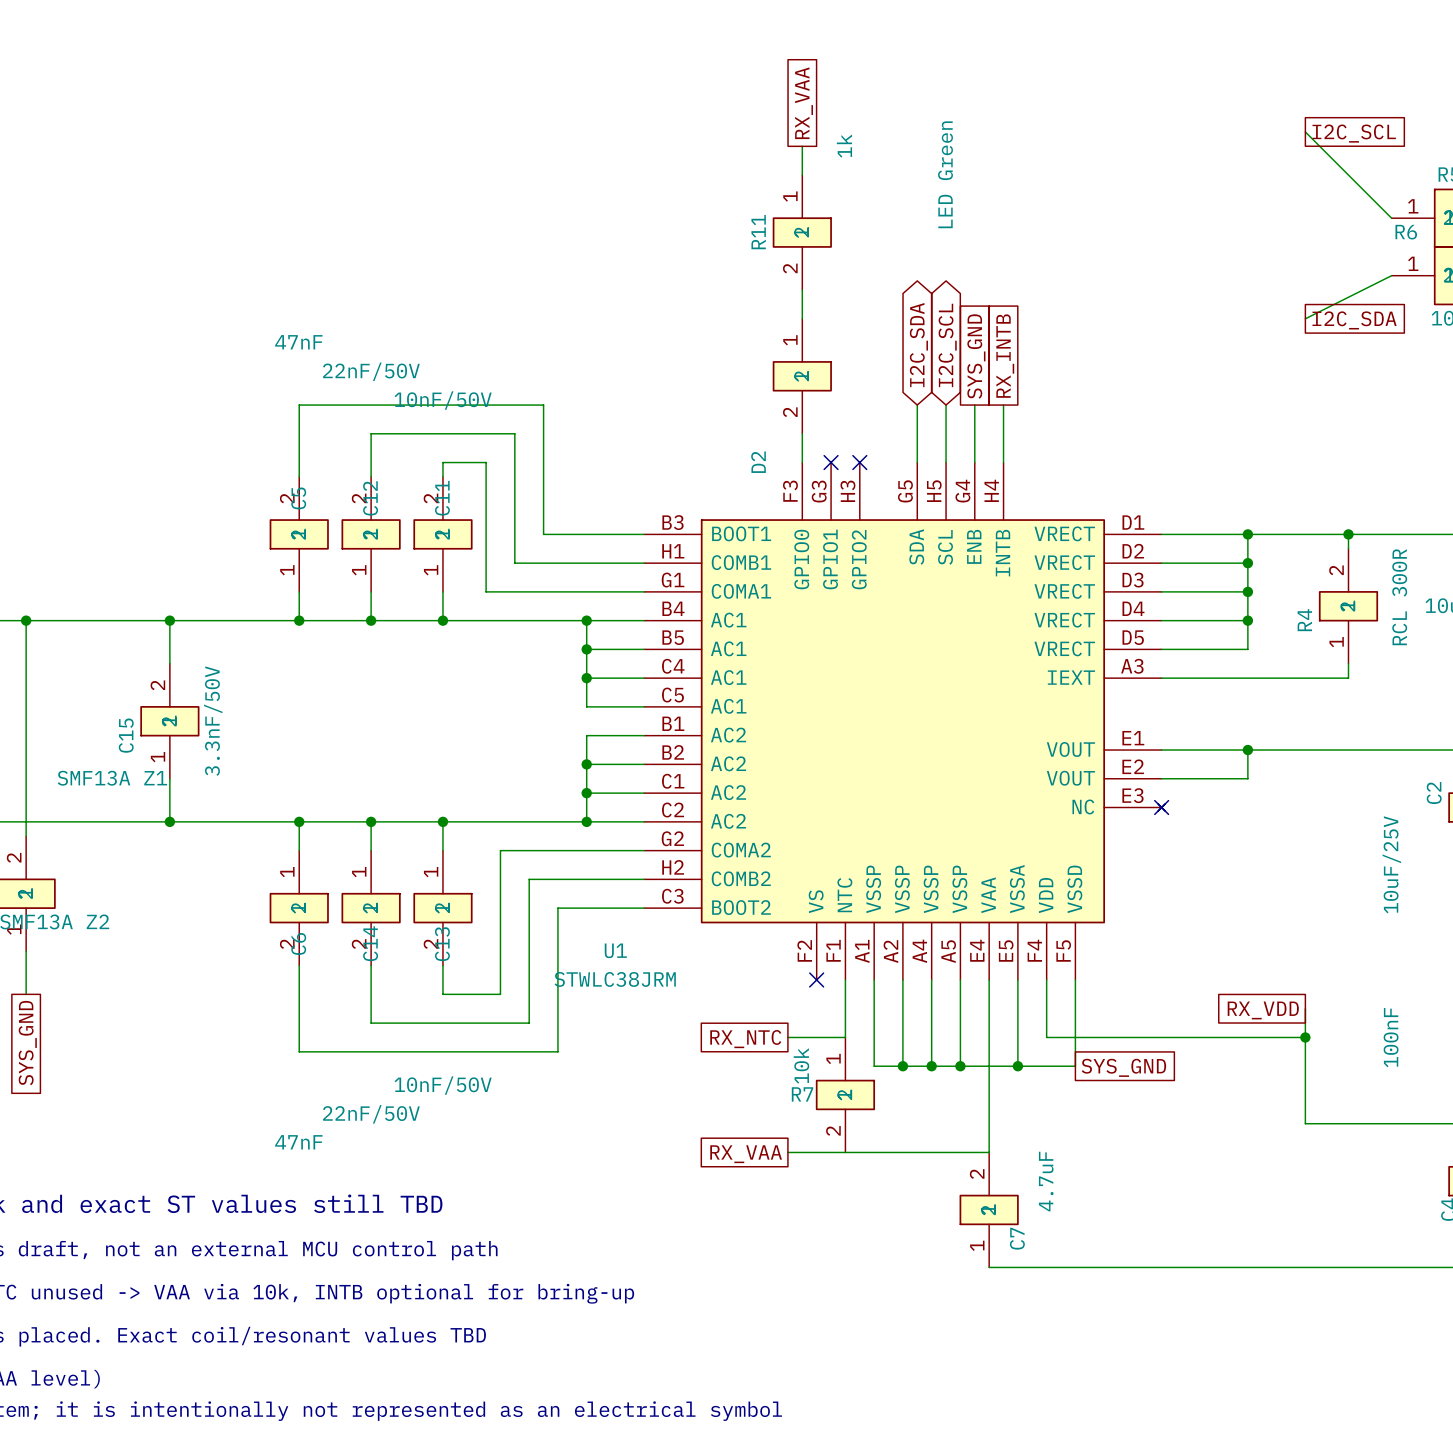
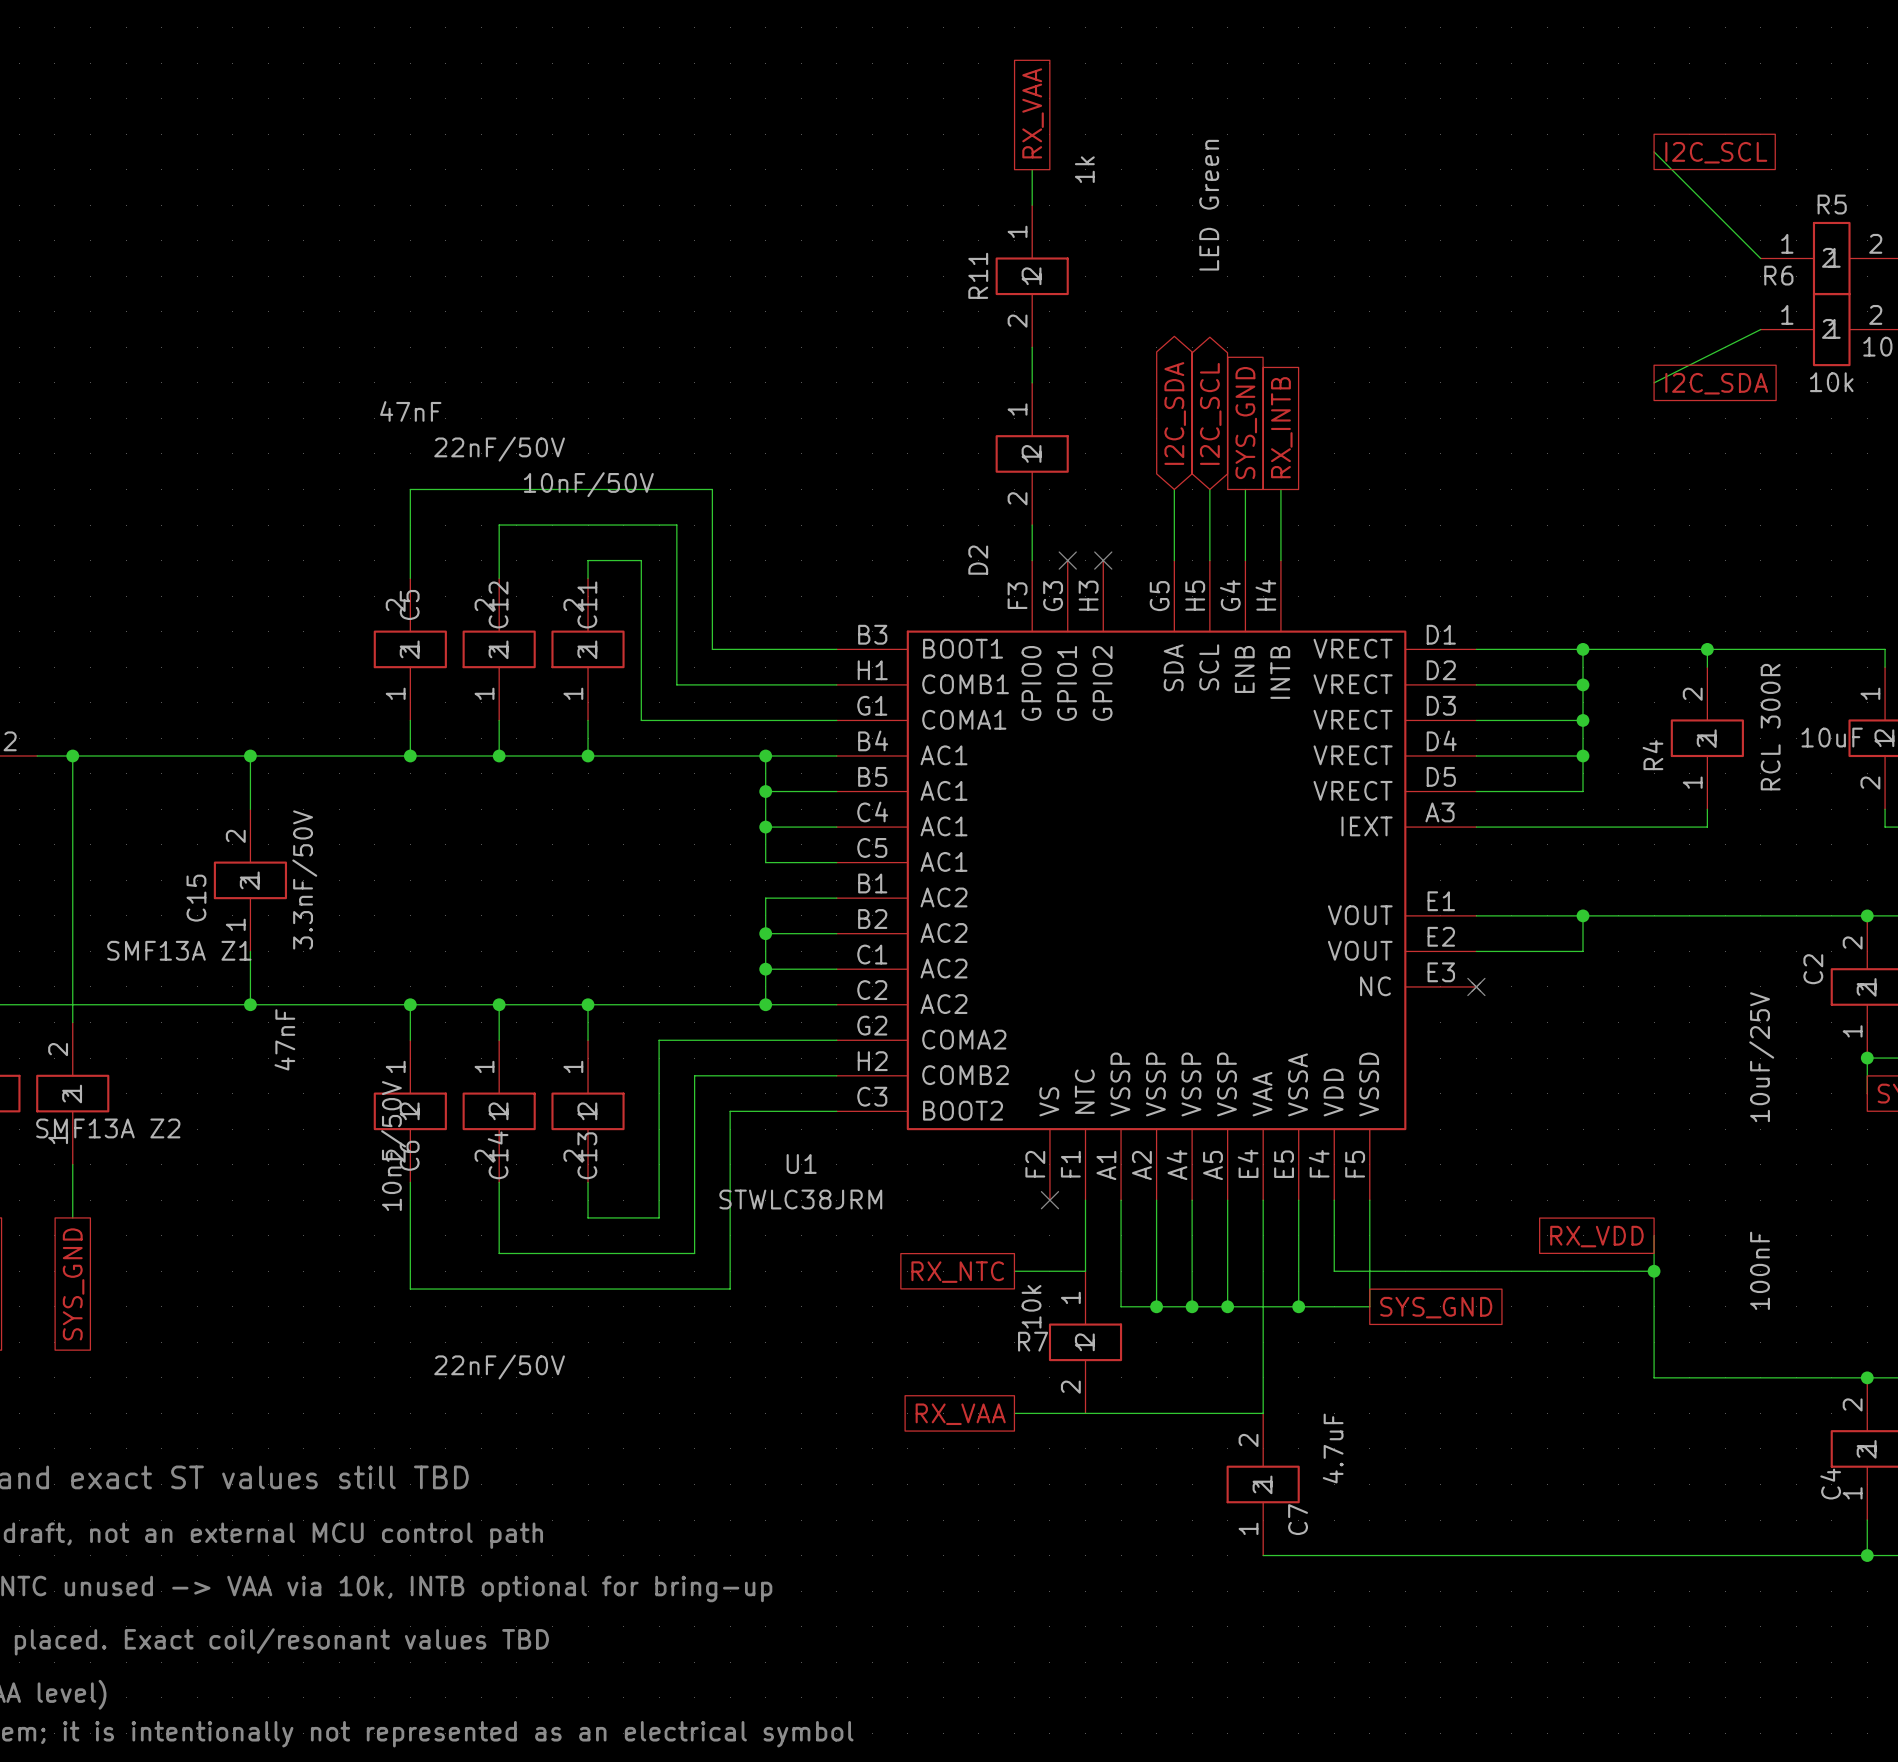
C13 value rotation: 0° (443, 1085) -> 90° counterclockwise (393, 1146)
C13 value position: 10nF/50V (443, 1085) -> 10nF/50V (393, 1146)
C6 value rotation: 0° (298, 1142) -> 90° counterclockwise (284, 1039)
C6 value position: 47nF (298, 1142) -> 47nF (284, 1039)

